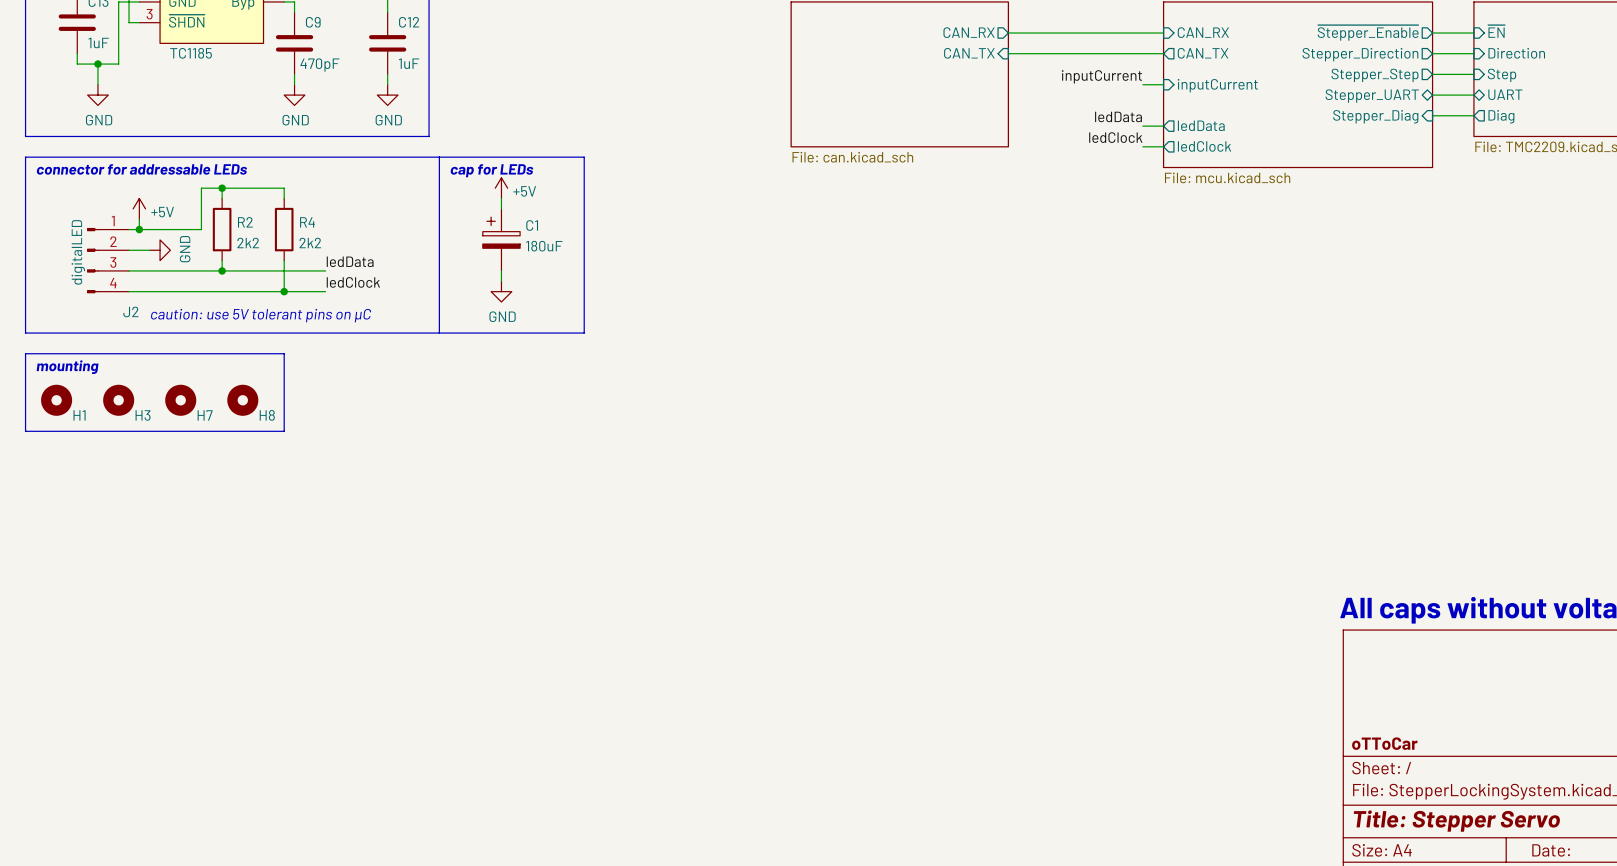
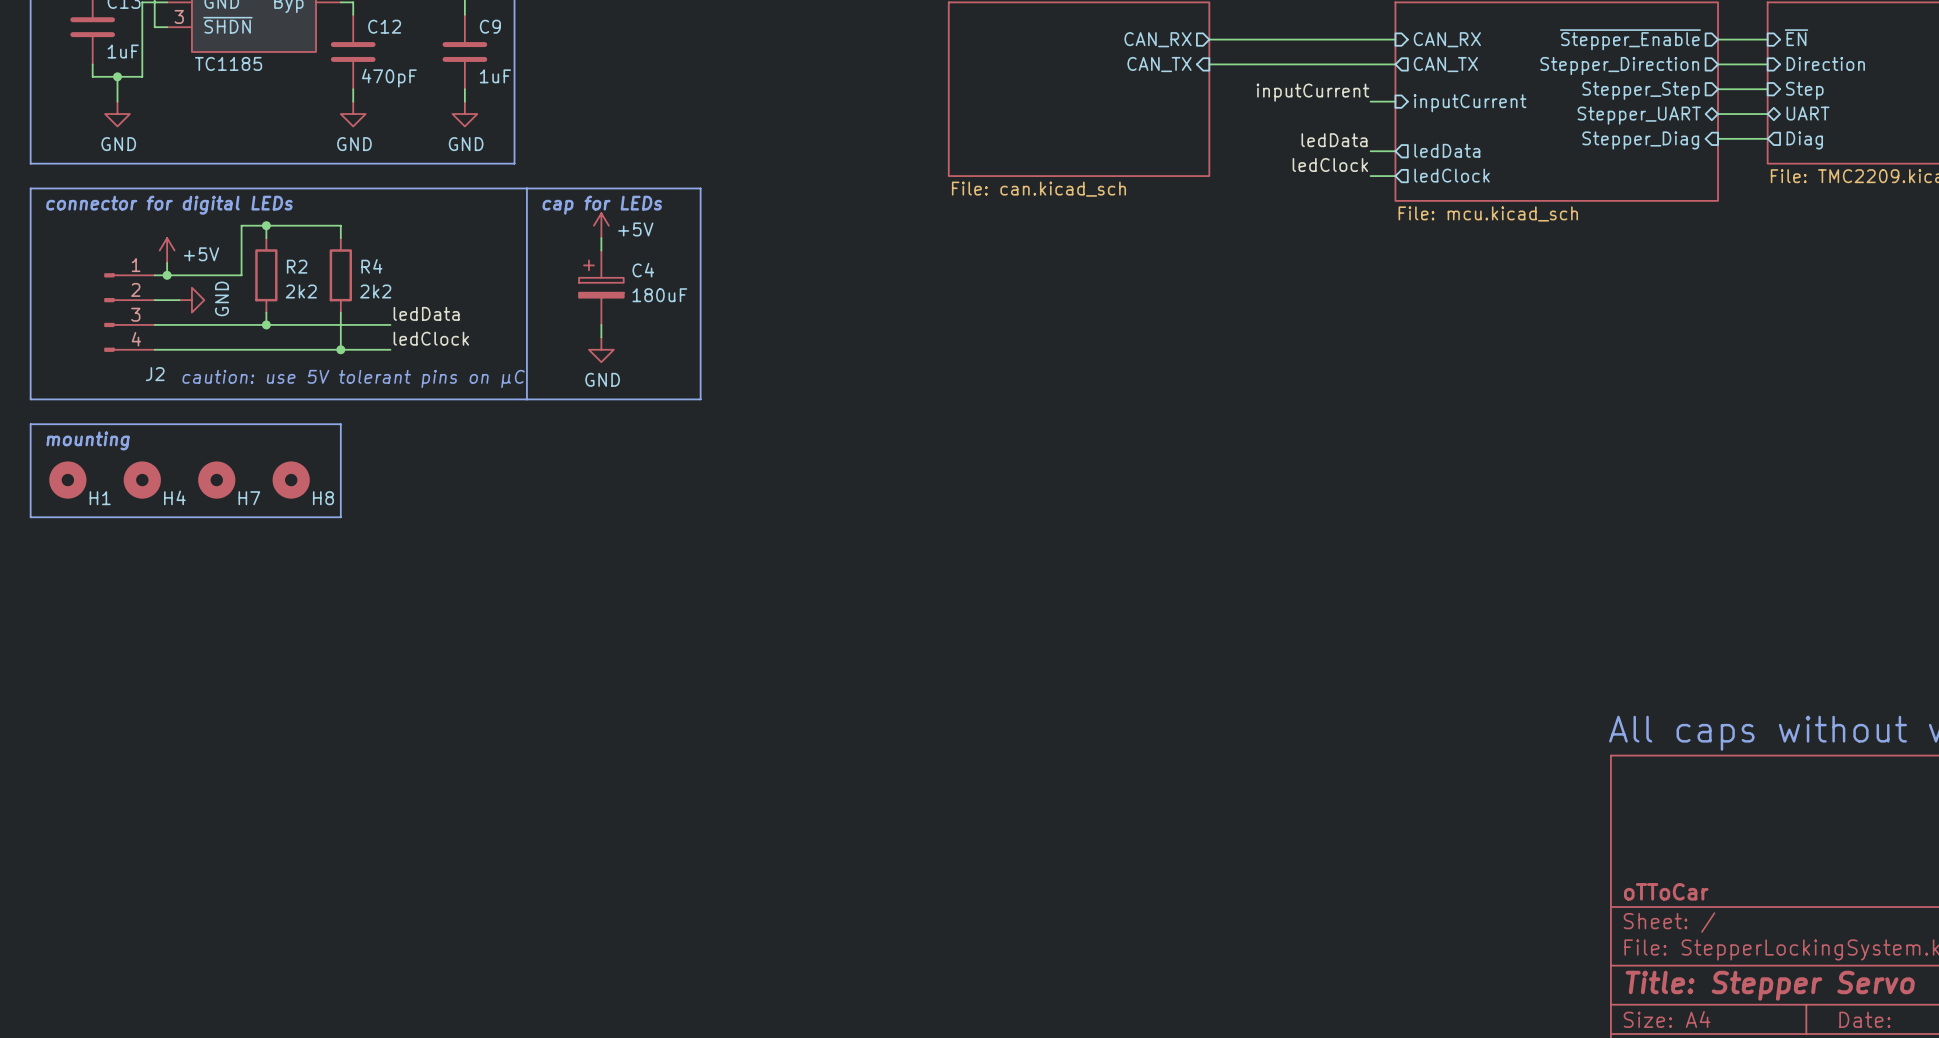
C9 name: C9 (313, 22) -> C12 (384, 26)
C12 name: C12 (409, 22) -> C9 (490, 26)
text: connector for addressable LEDs (141, 169) -> connector for digital LEDs (169, 205)
C1 name: C1 (532, 225) -> C4 (643, 270)
J2 value: digitalLED (78, 252) -> none
H3 name: H3 (143, 415) -> H4 (174, 497)

